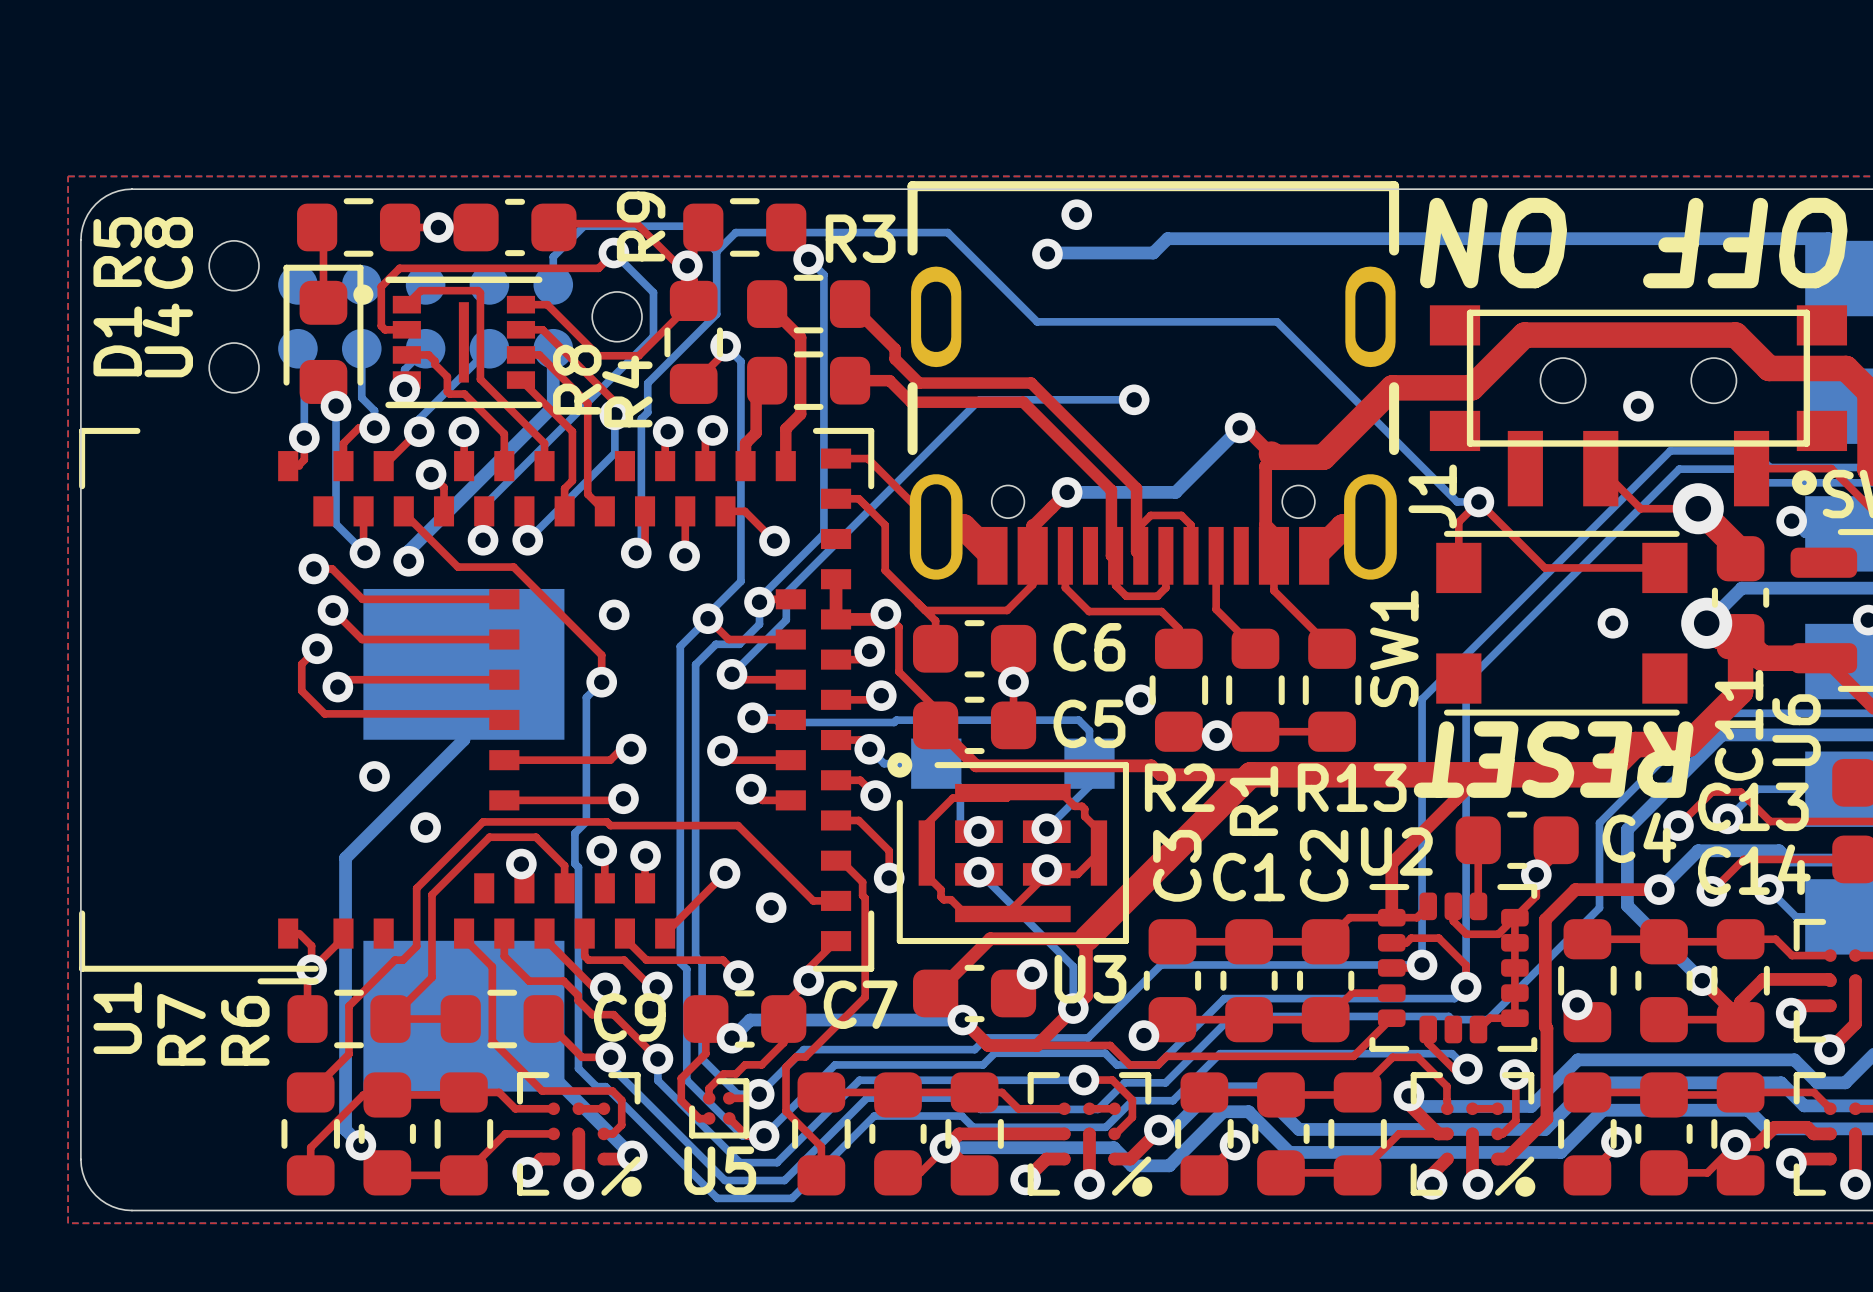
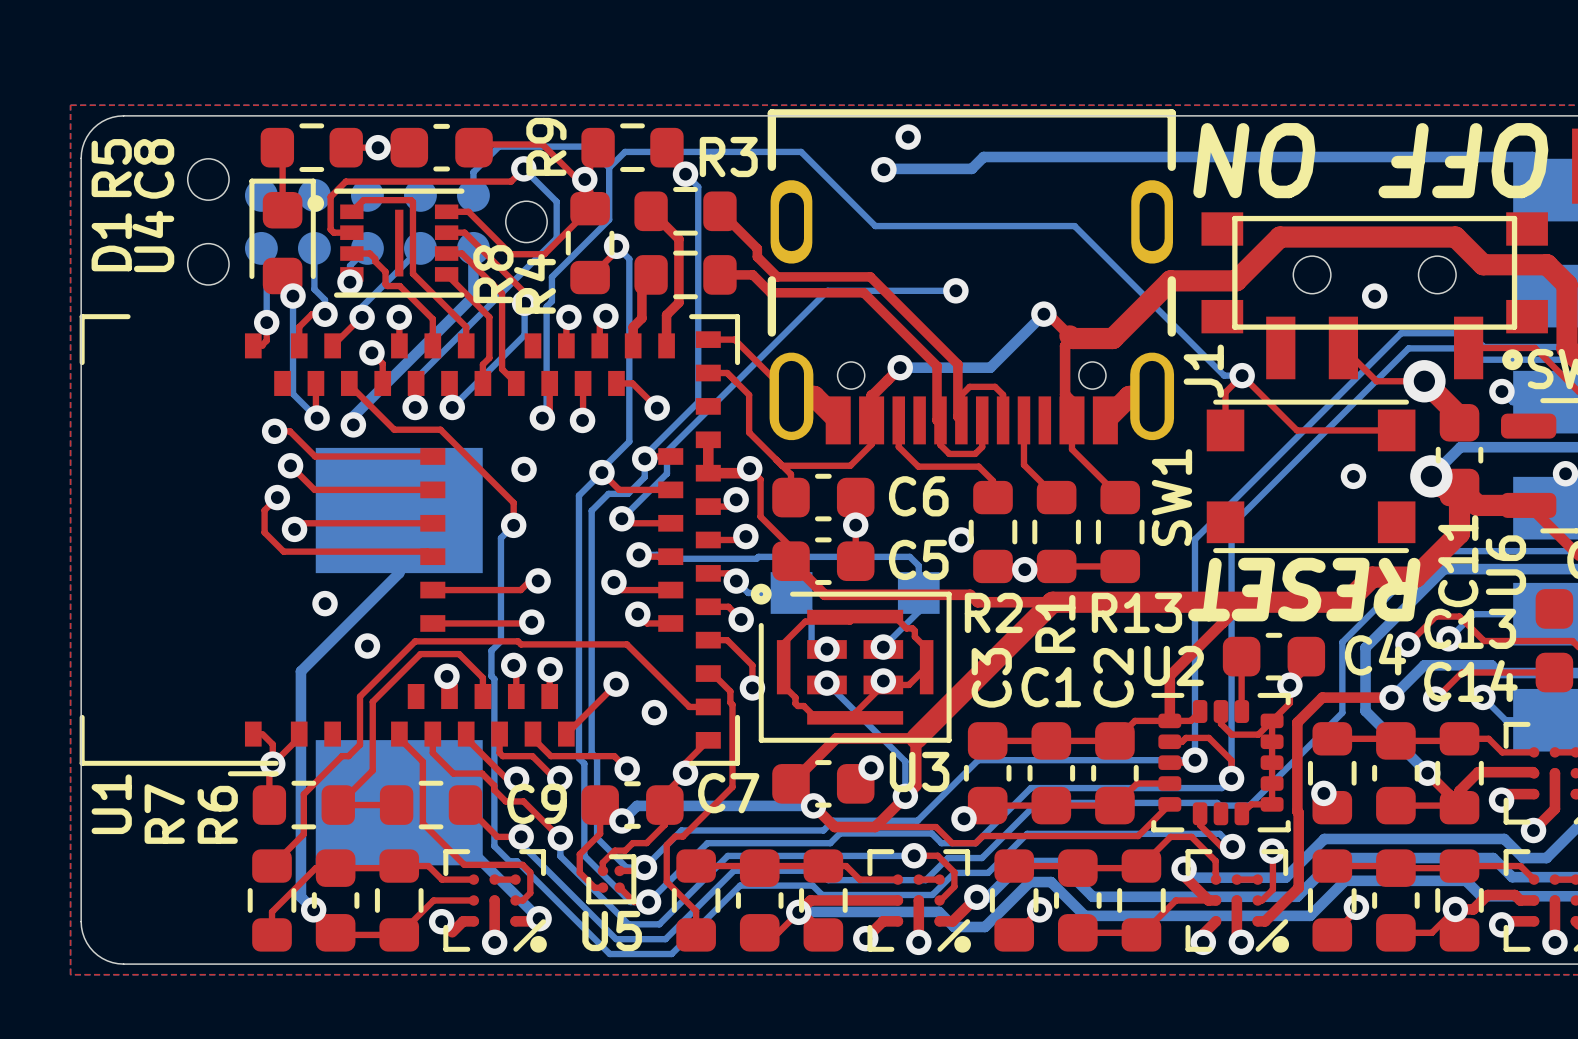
via position: (527, 1172) -> (441, 921)

